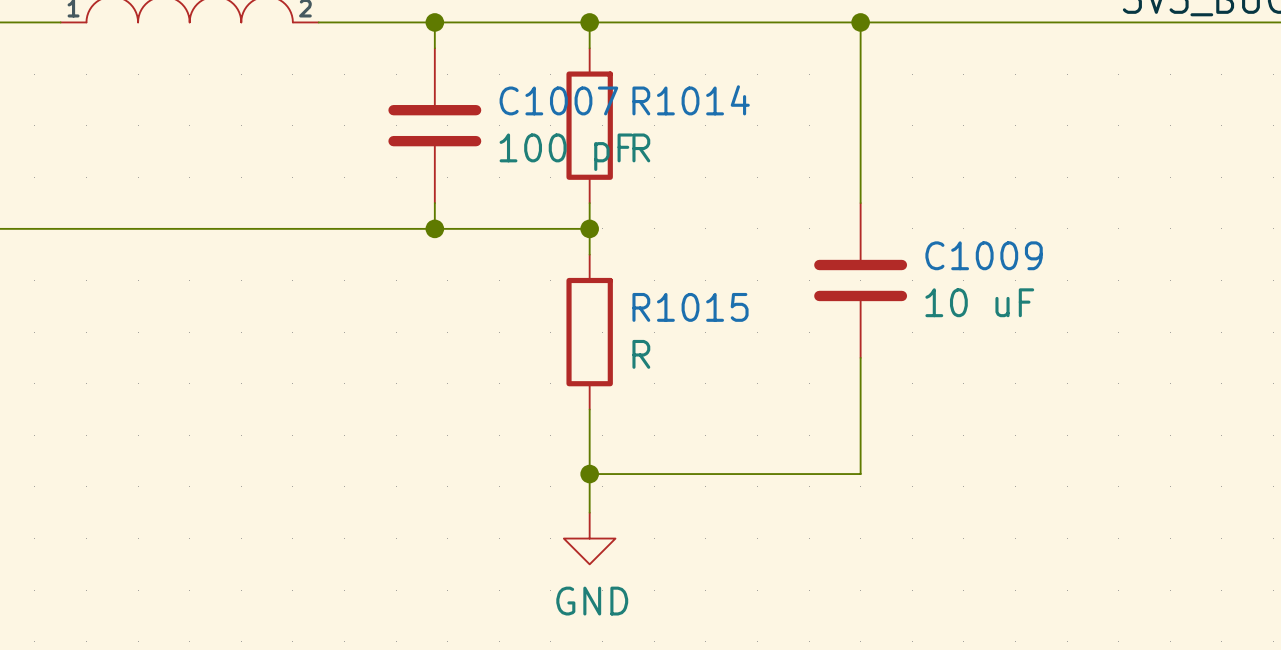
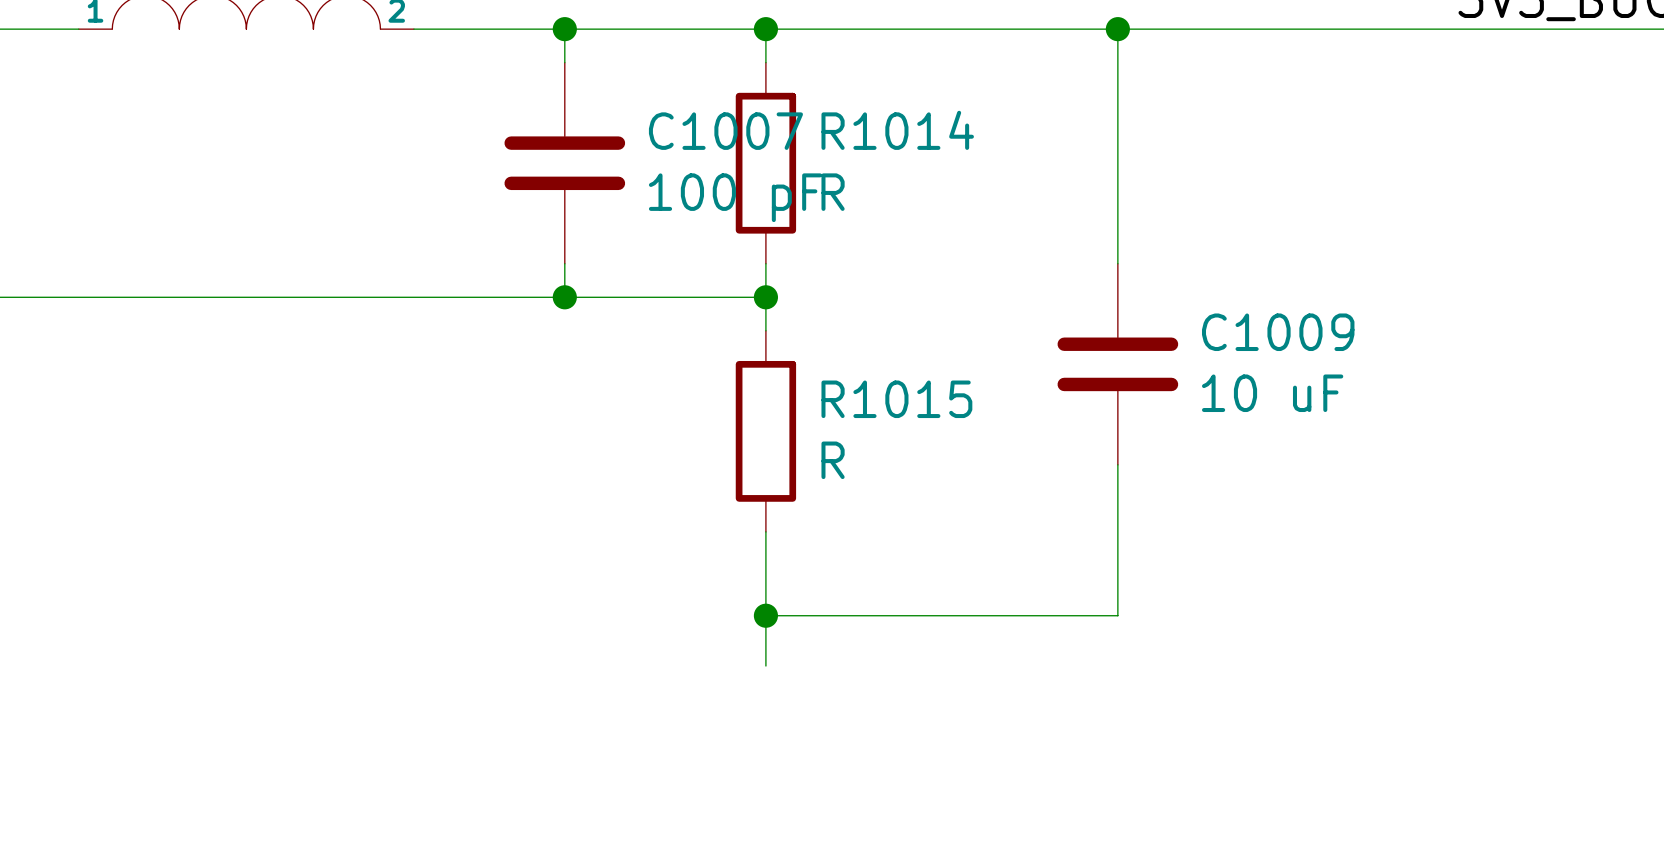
power symbol: GND (589, 538) -> none

